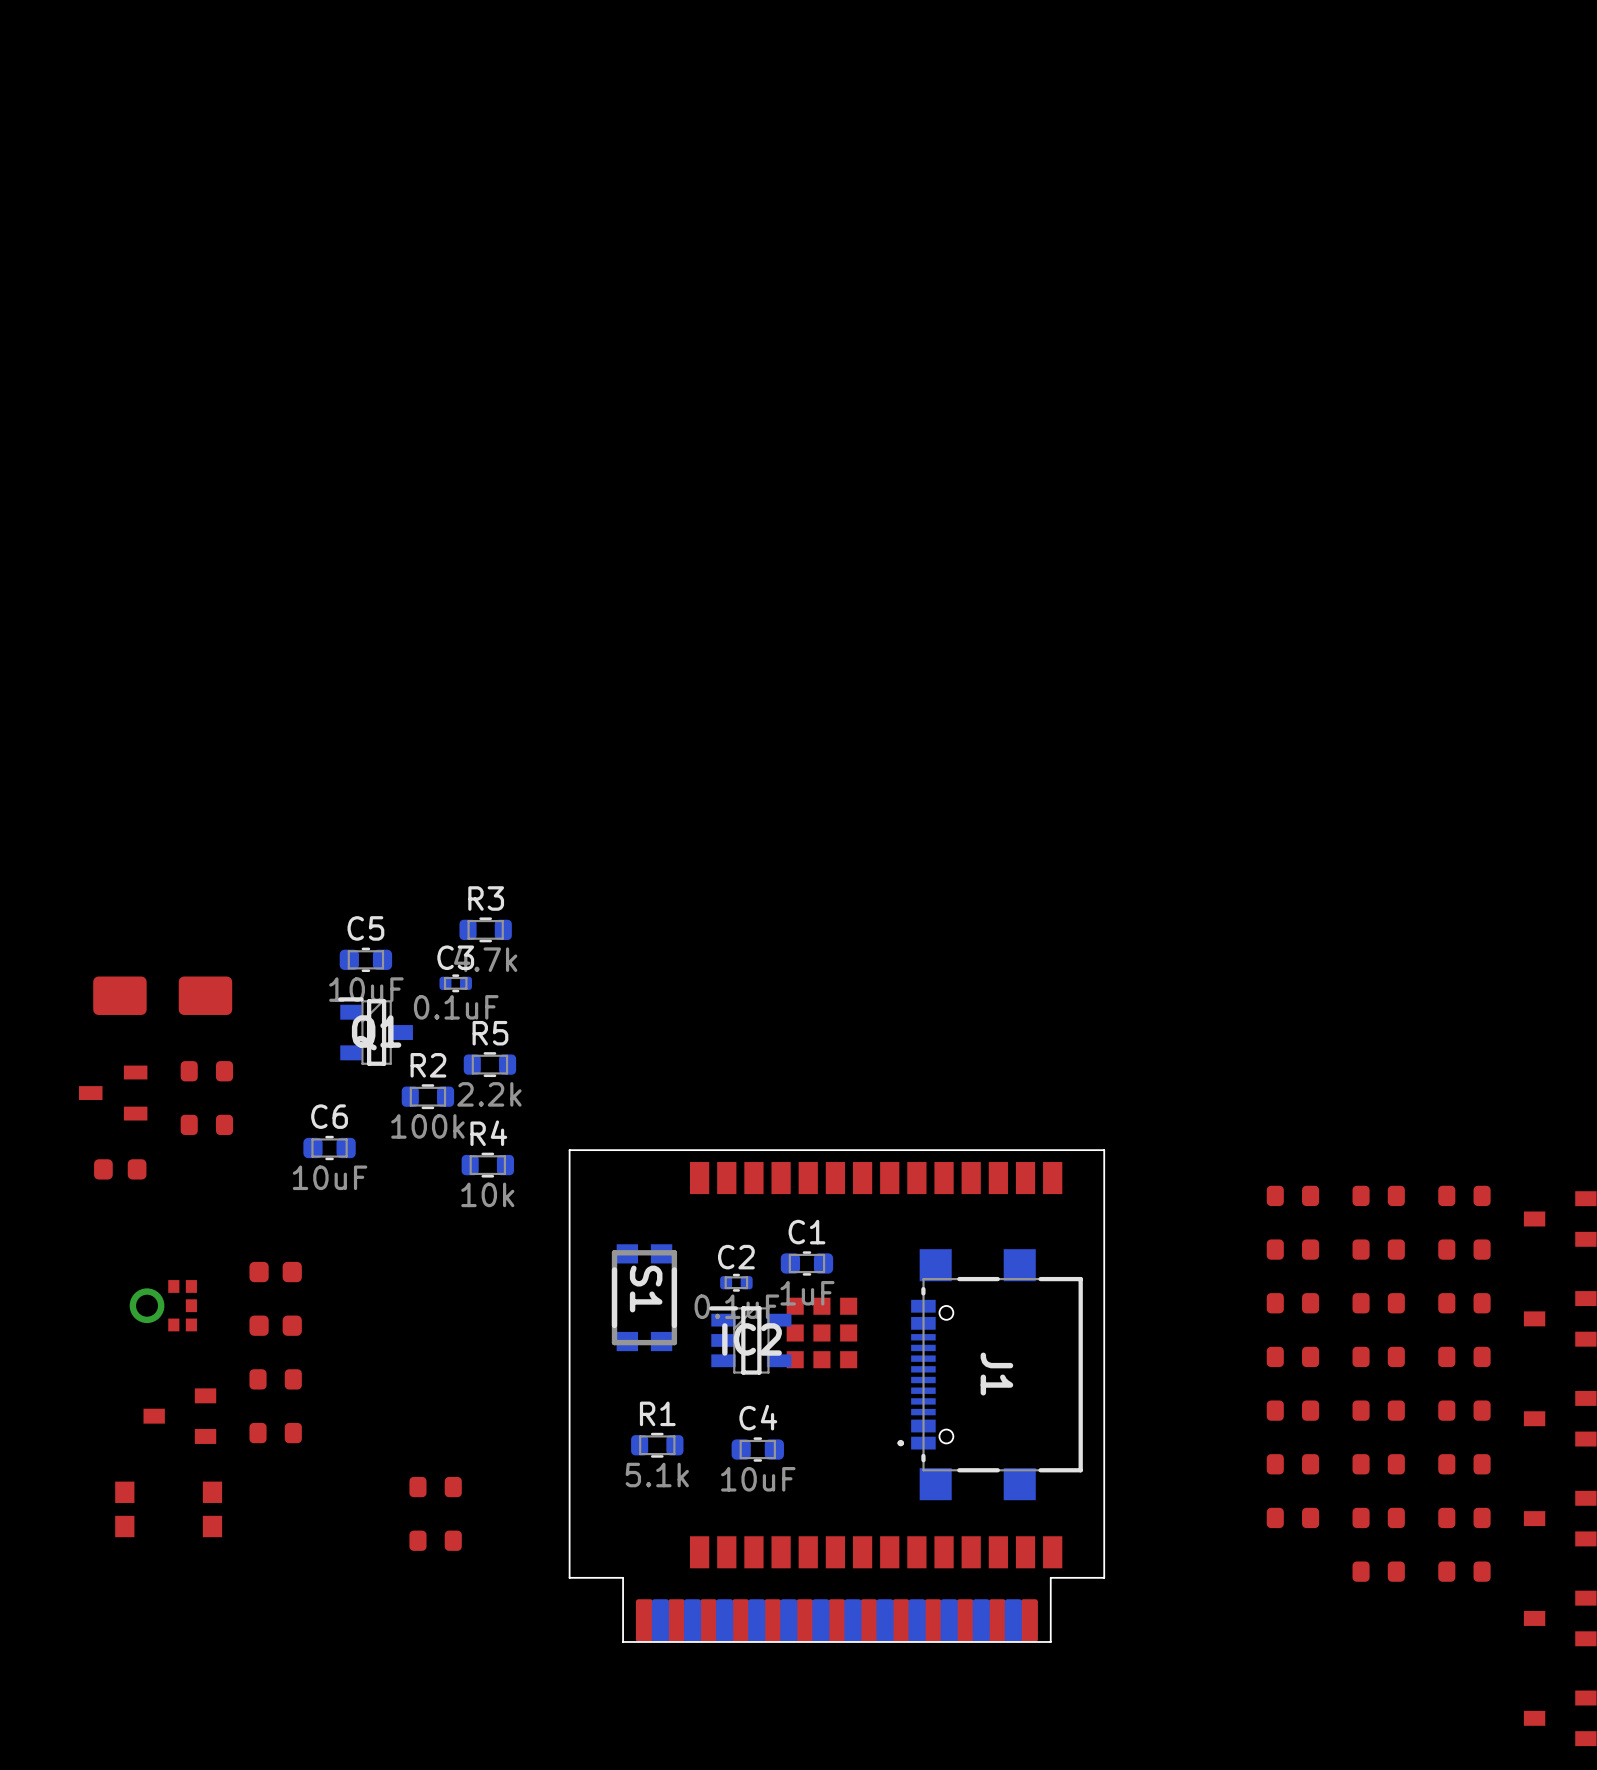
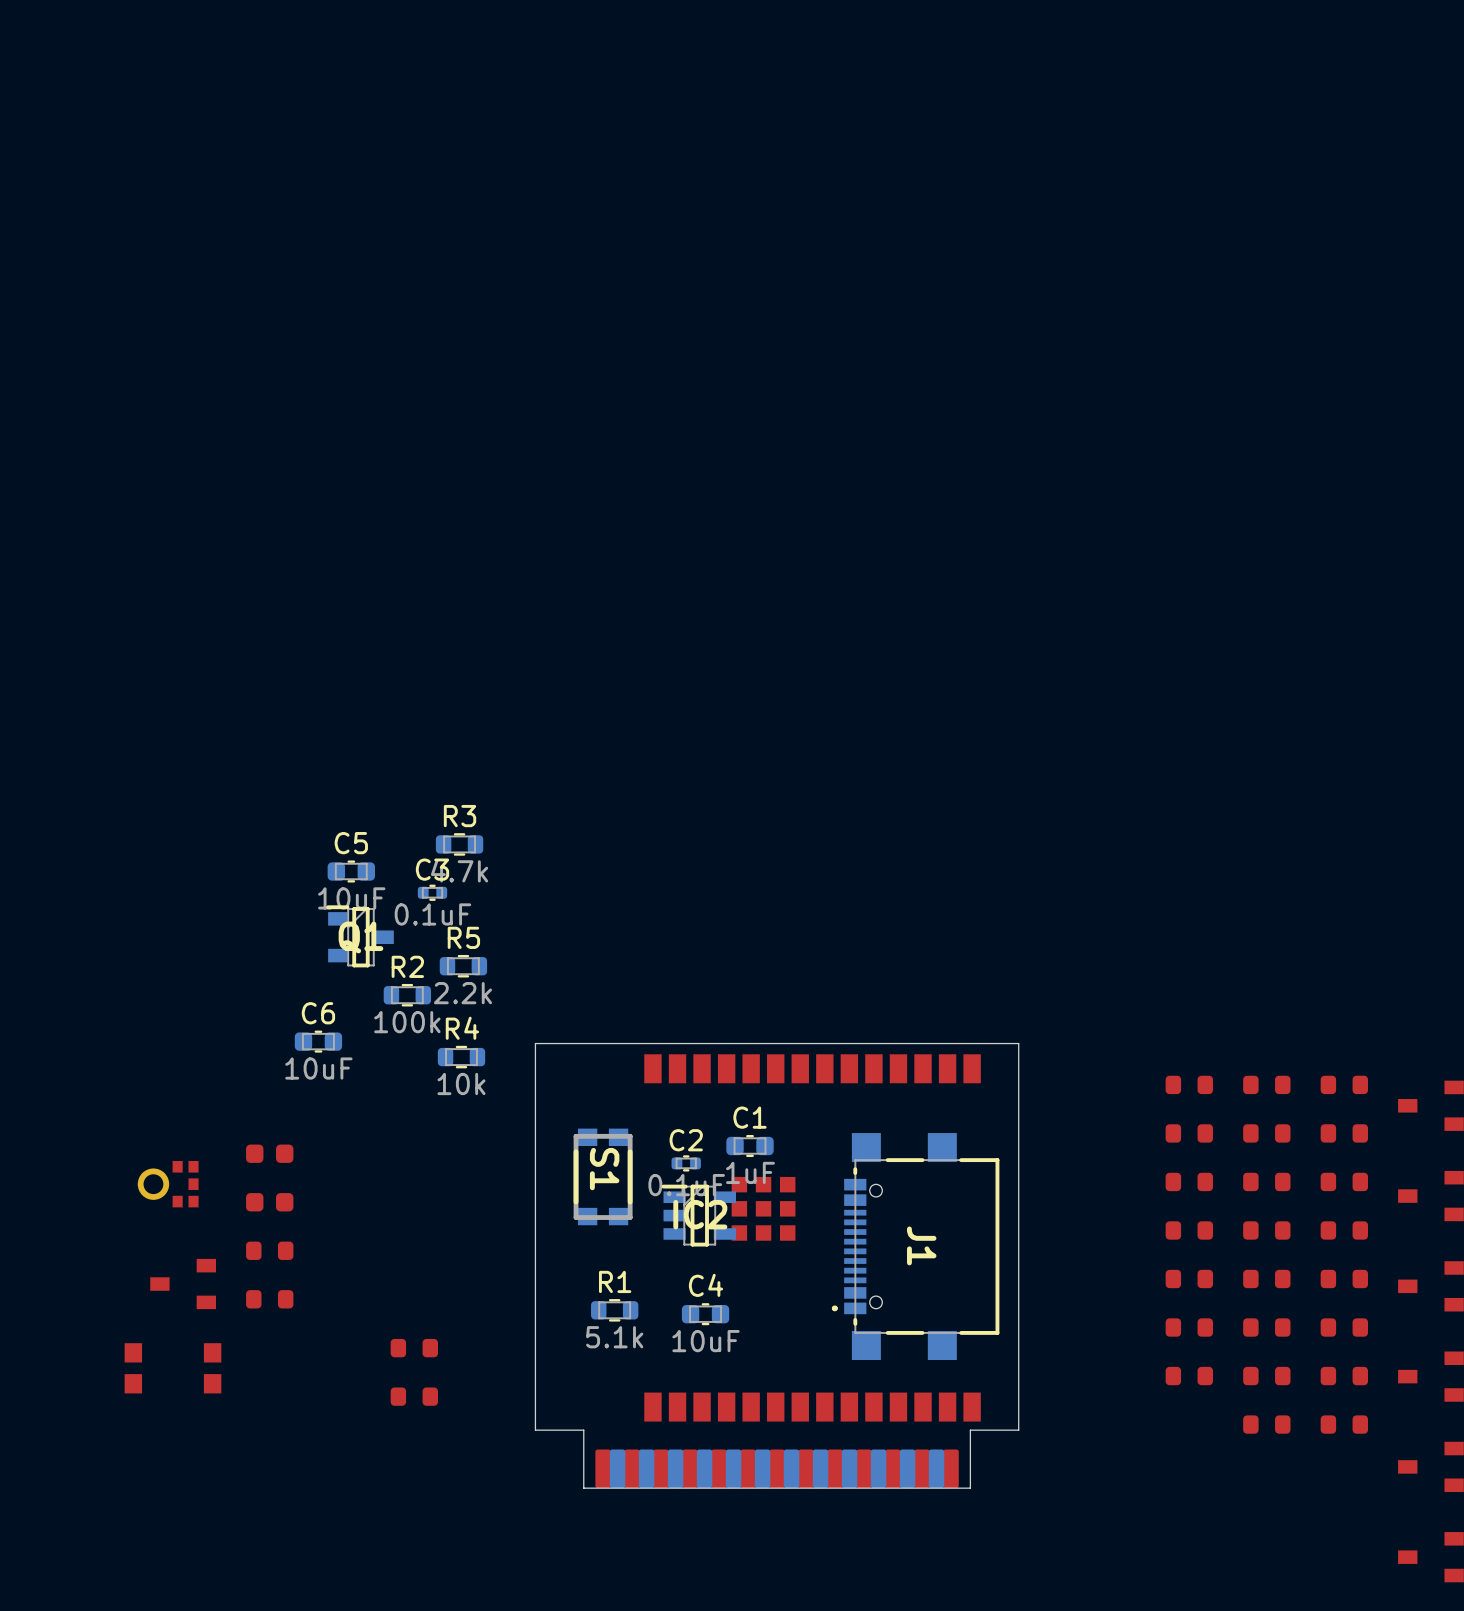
part: (162, 995) -> none
part: (206, 1071) -> none
part: (113, 1093) -> none
part: (206, 1124) -> none
part: (120, 1169) -> none

